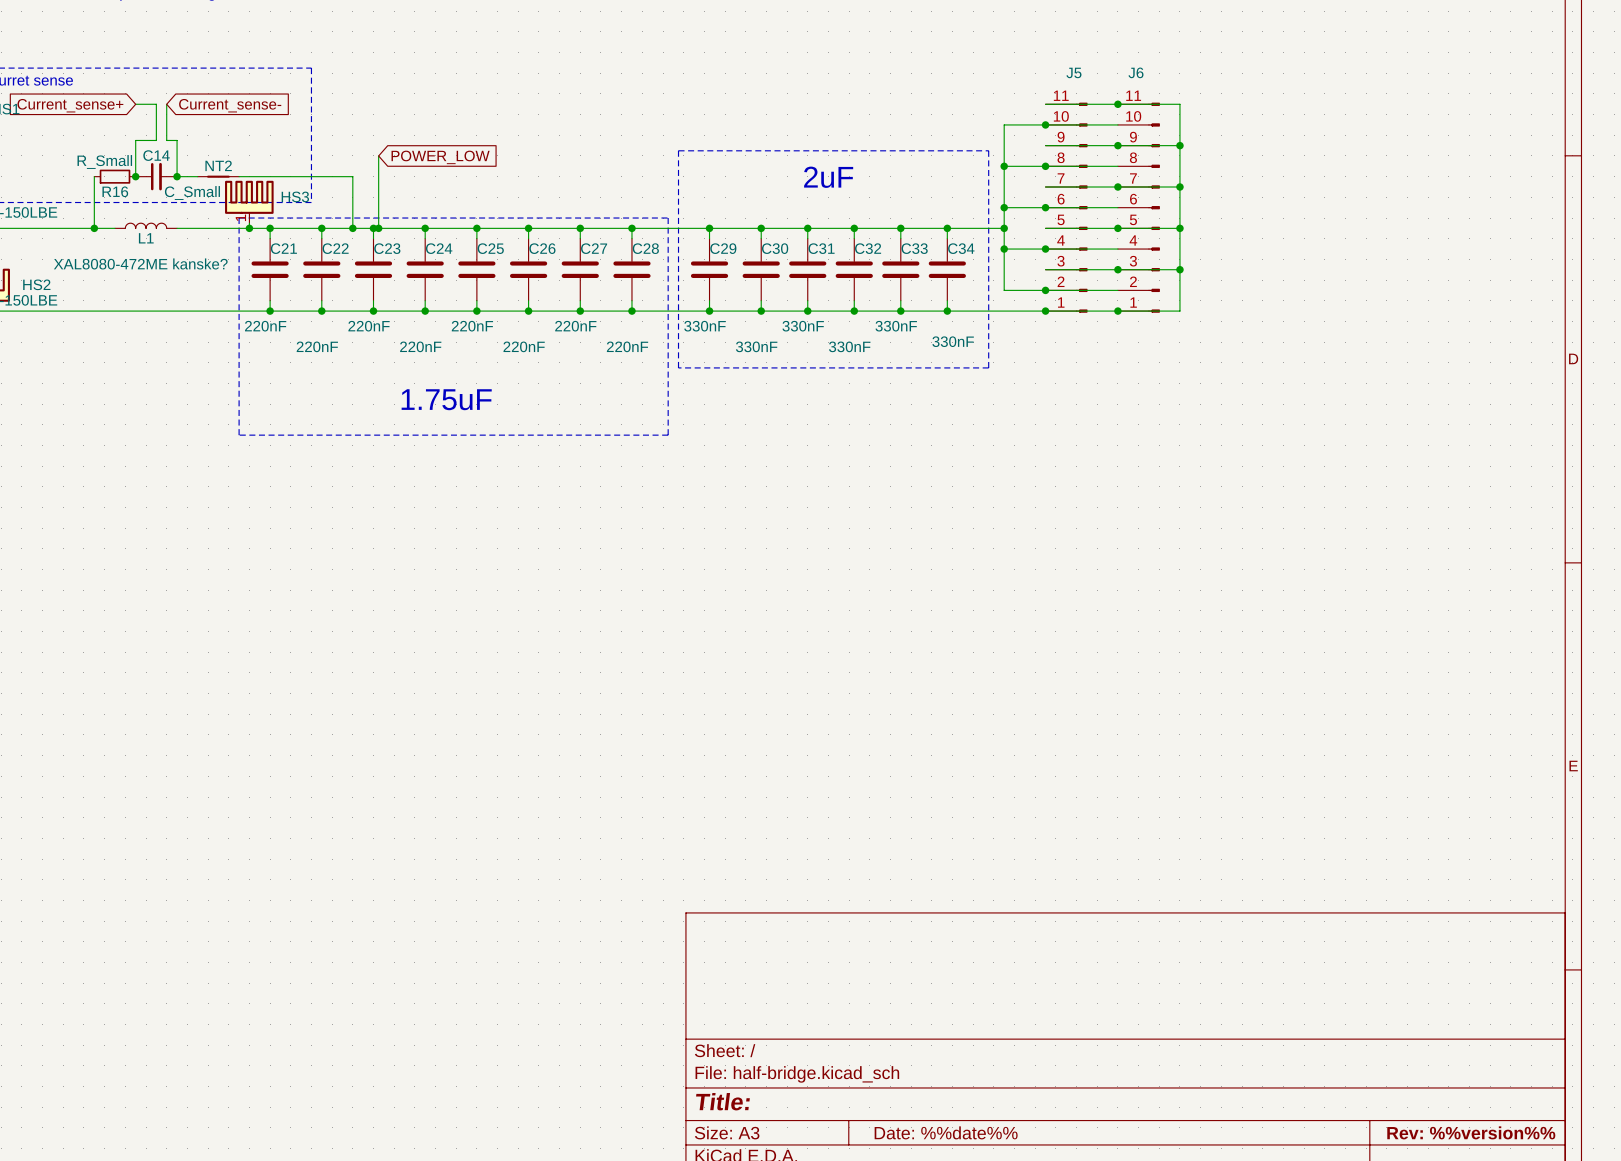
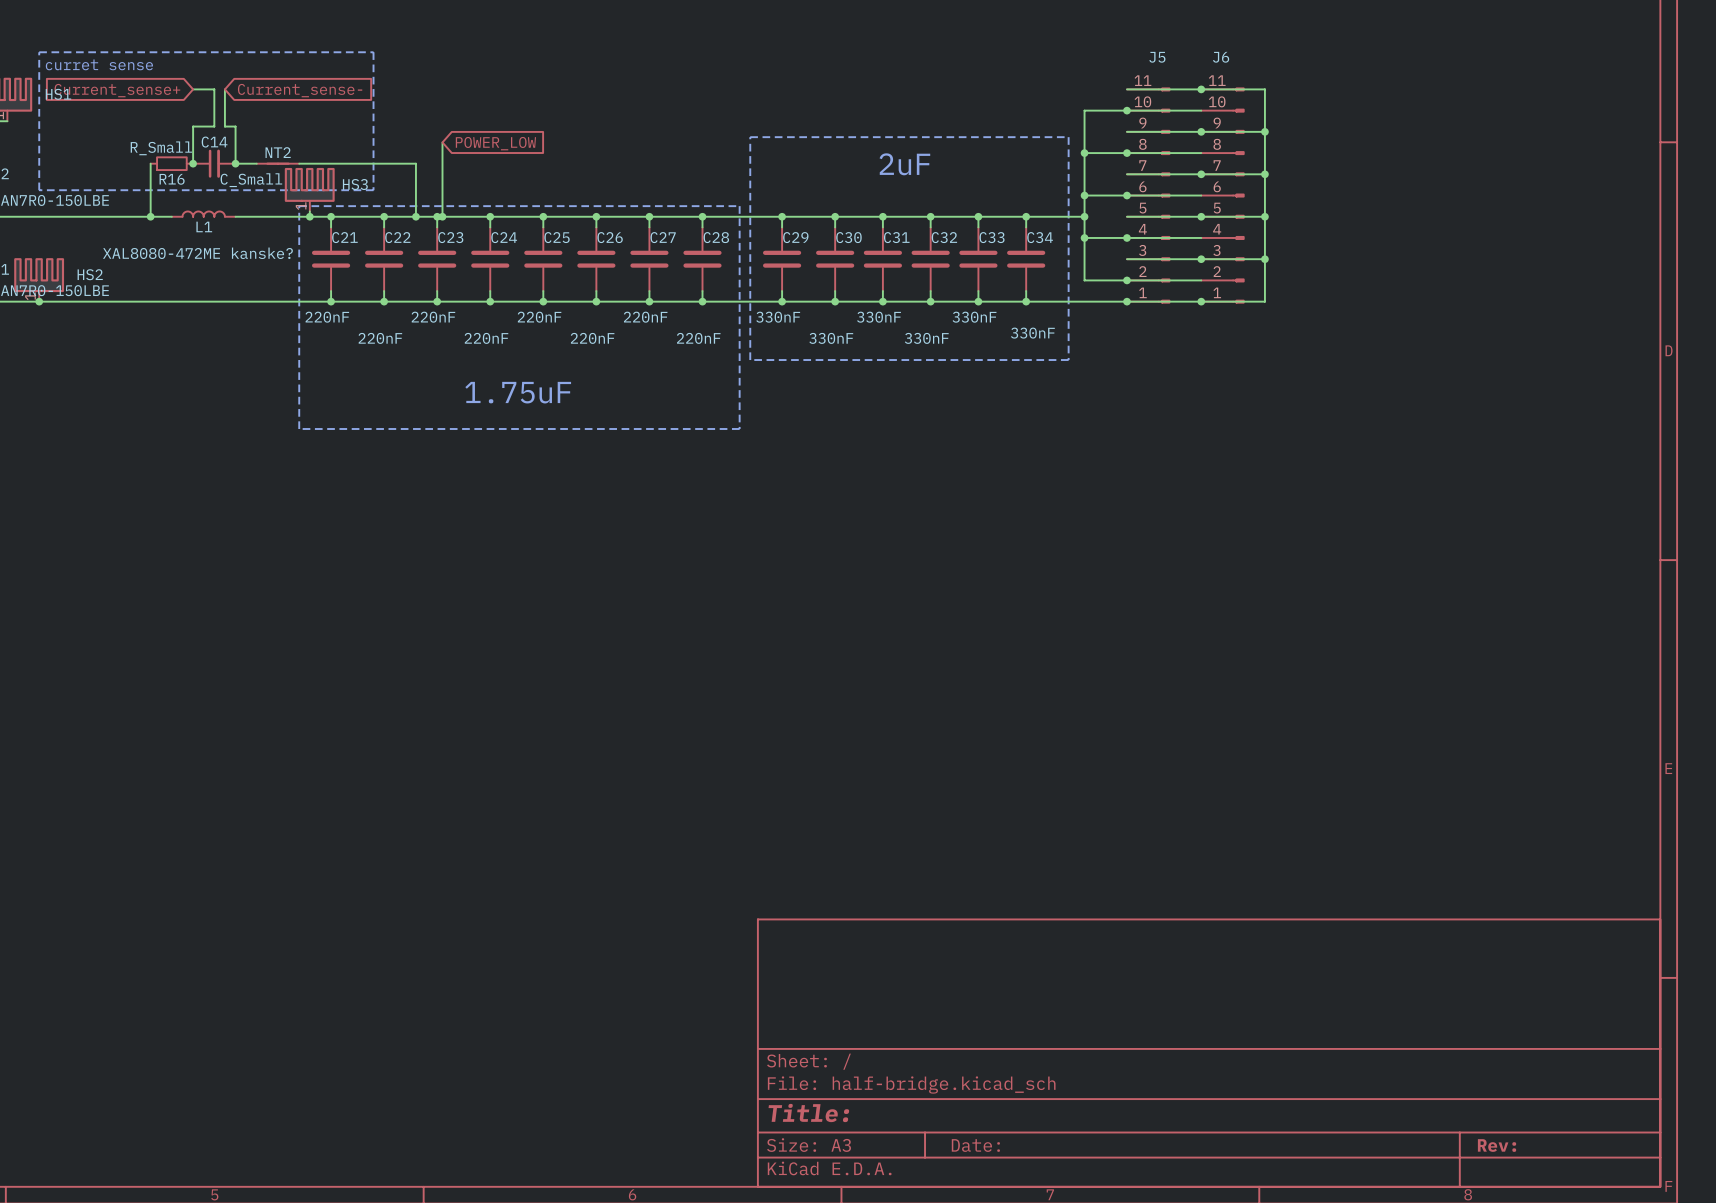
title block: Date: %%date%% (946, 1132) -> Date: (975, 1145)
title block: Rev: %%version%% (1471, 1132) -> Rev: (1497, 1145)

